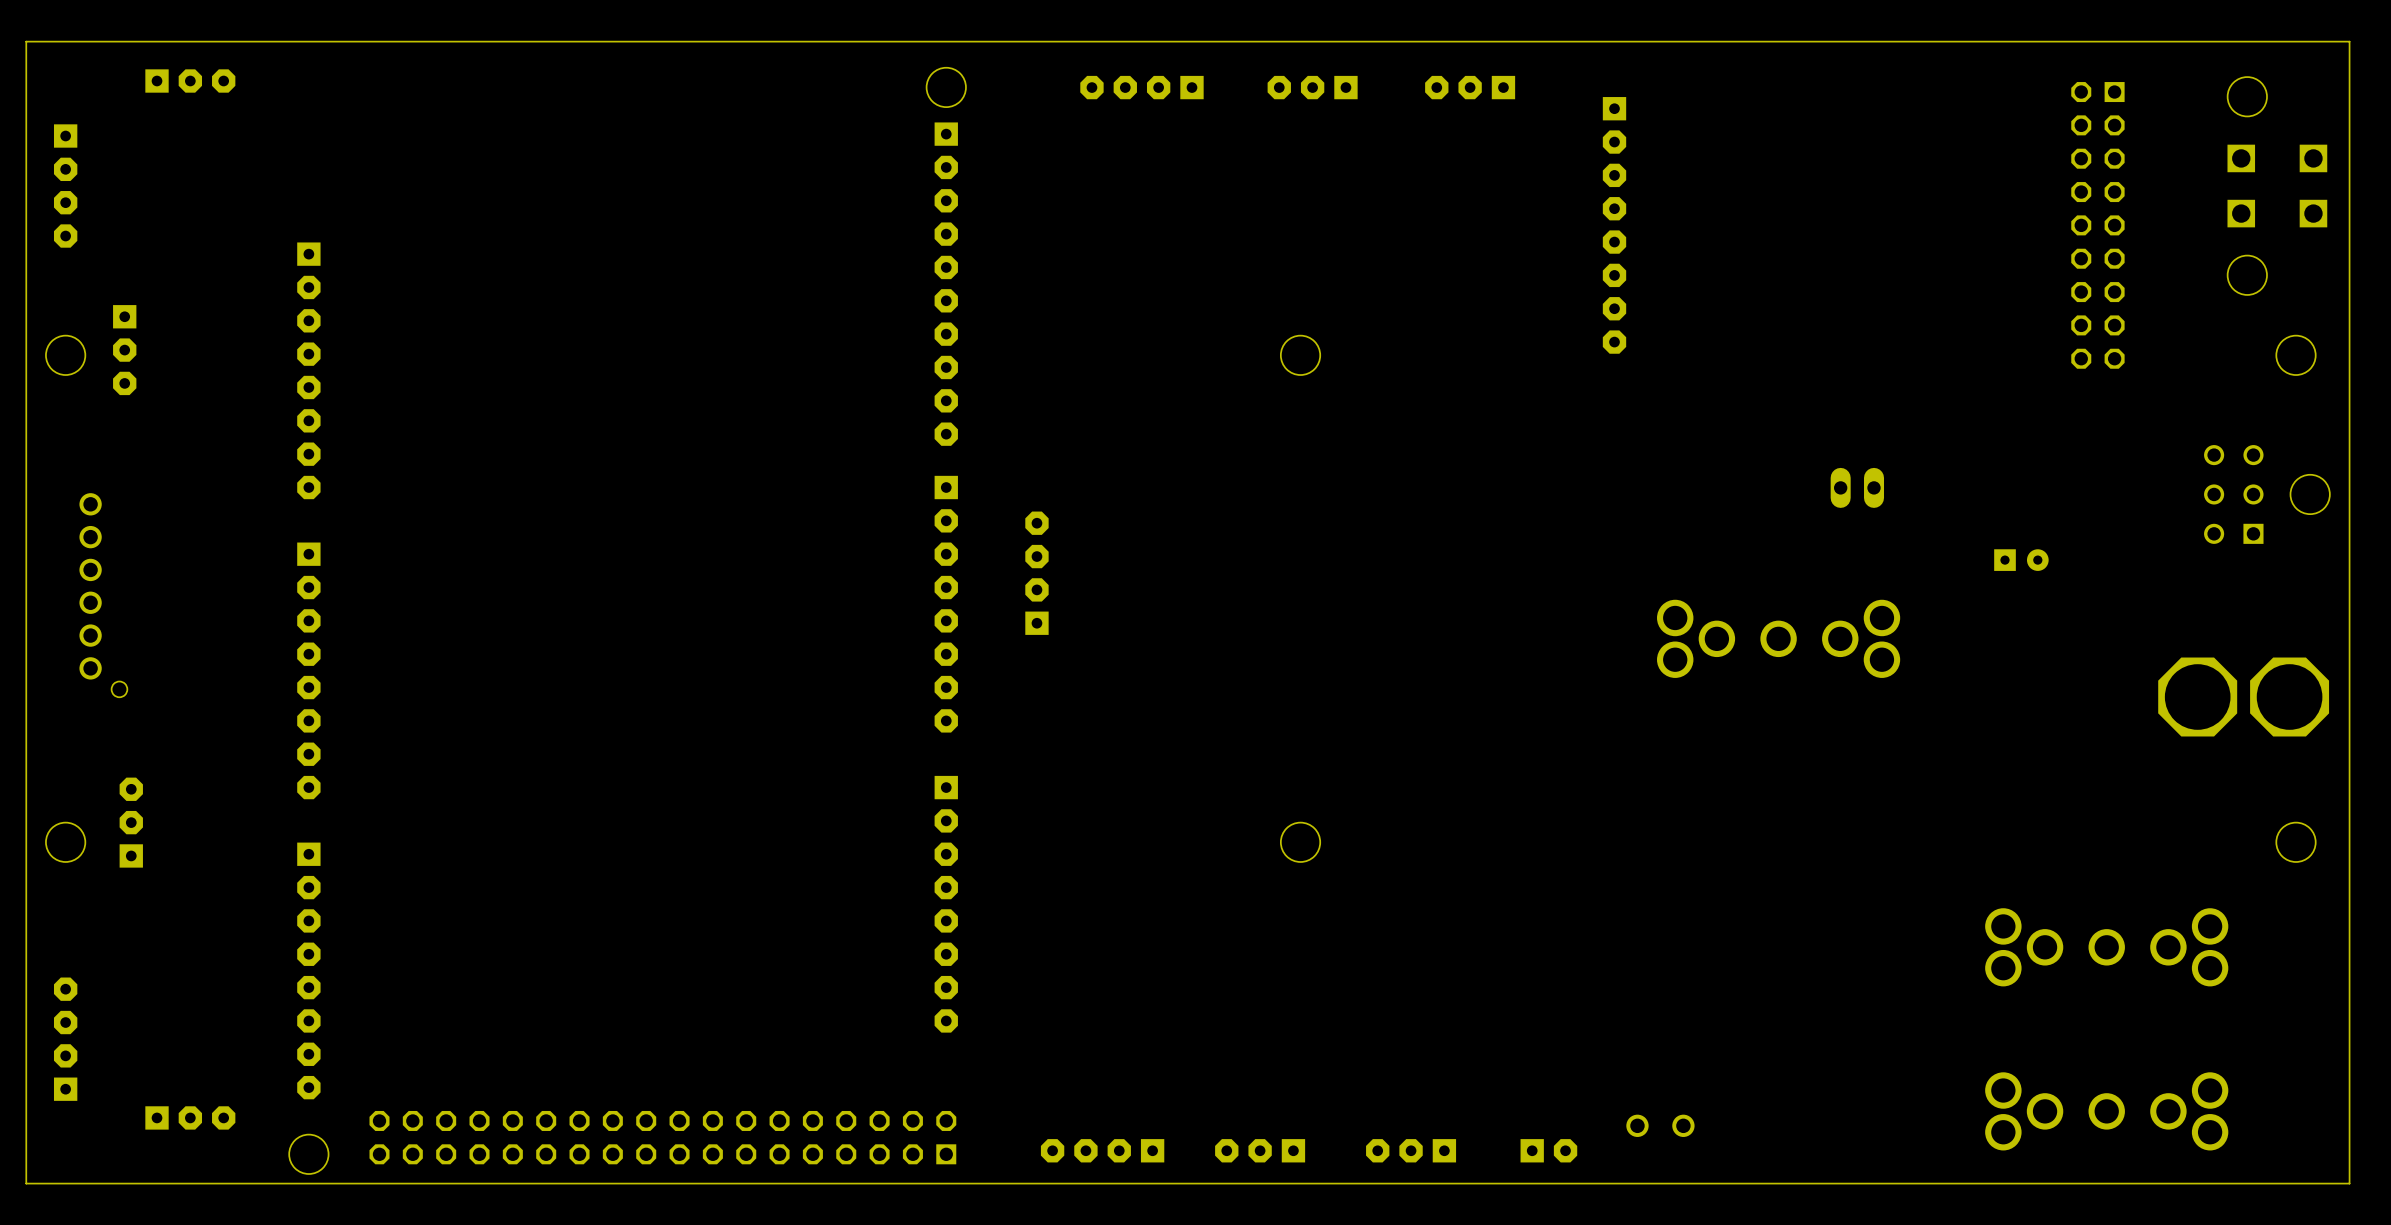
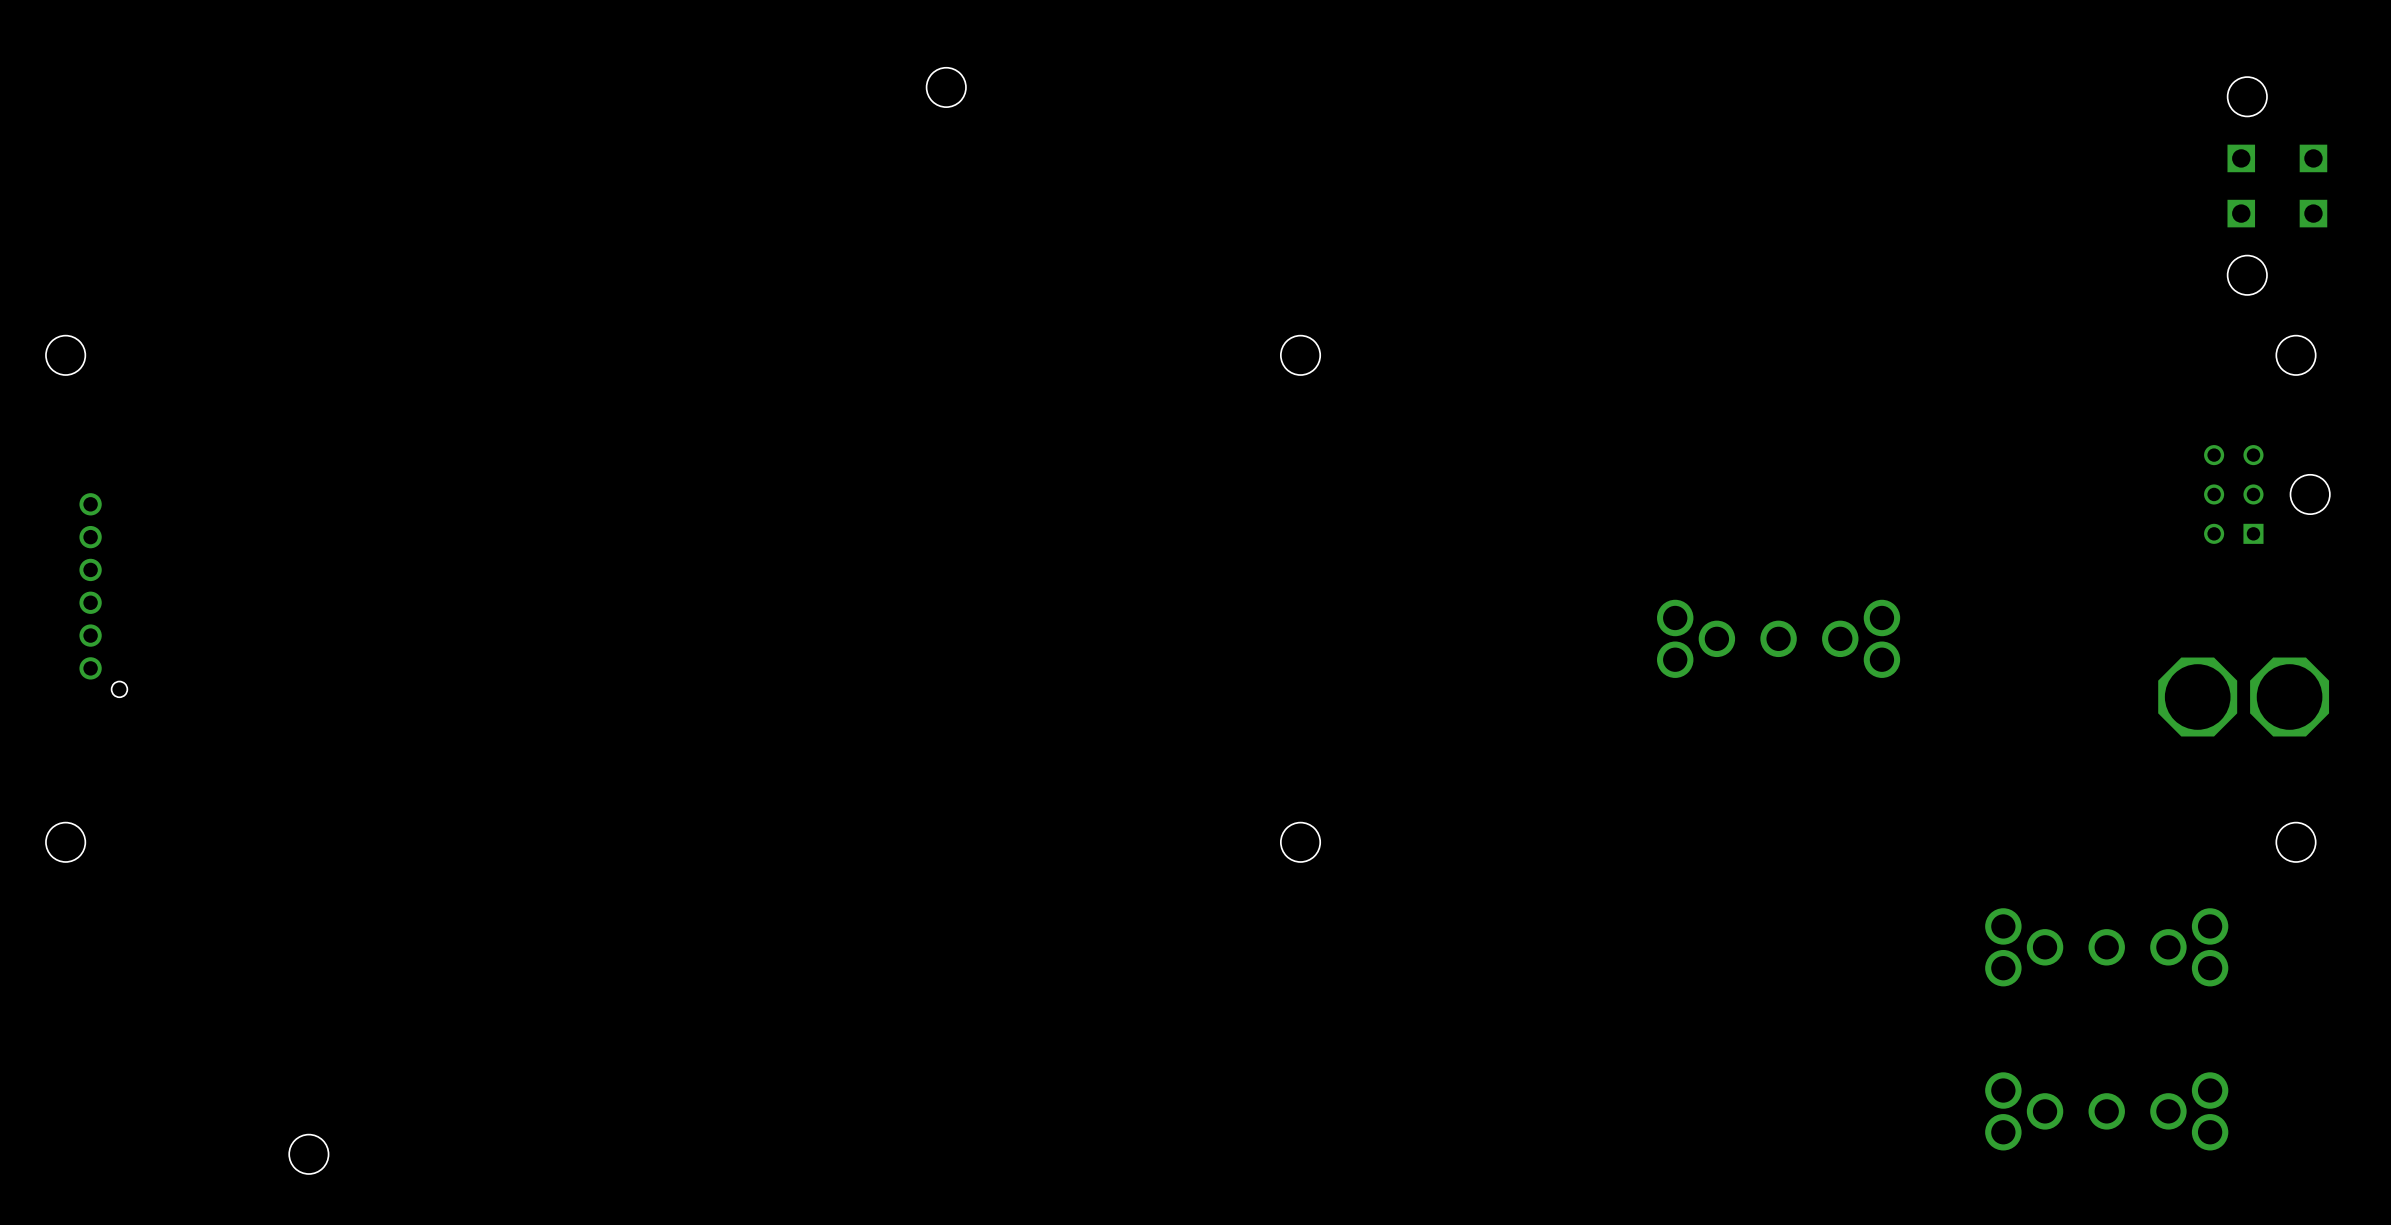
board edge: (2349, 41) (26, 41) (26, 1183) (2349, 1183) (2349, 41) -> none
part: (190, 81) -> none
part: (1141, 87) -> none
part: (1312, 87) -> none
part: (1470, 87) -> none
part: (65, 186) -> none
part: (1614, 225) -> none
part: (2097, 225) -> none
part: (946, 284) -> none
part: (124, 350) -> none
part: (308, 370) -> none
part: (1857, 487) -> none
part: (2021, 560) -> none
part: (1036, 573) -> none
part: (946, 604) -> none
part: (308, 670) -> none
part: (131, 822) -> none
part: (946, 904) -> none
part: (308, 970) -> none
part: (65, 1039) -> none
part: (190, 1117) -> none
part: (1660, 1125) -> none
part: (662, 1137) -> none
part: (1102, 1150) -> none
part: (1260, 1150) -> none
part: (1411, 1150) -> none
part: (1548, 1150) -> none

